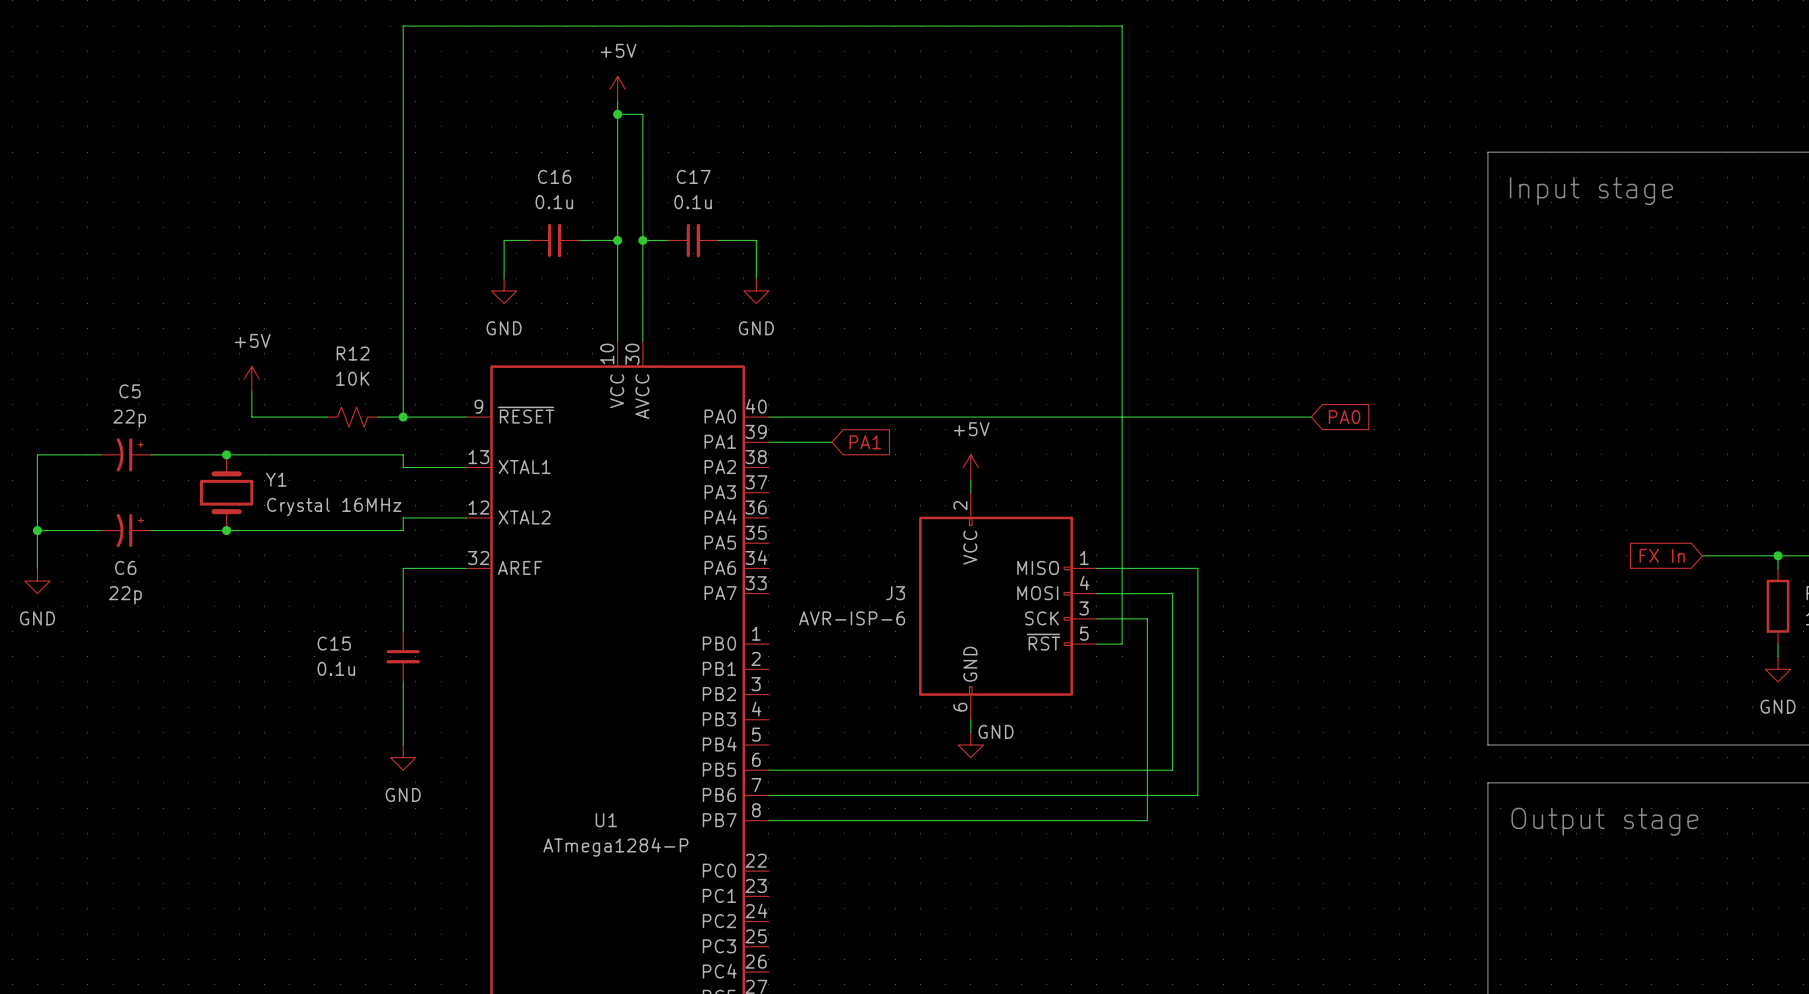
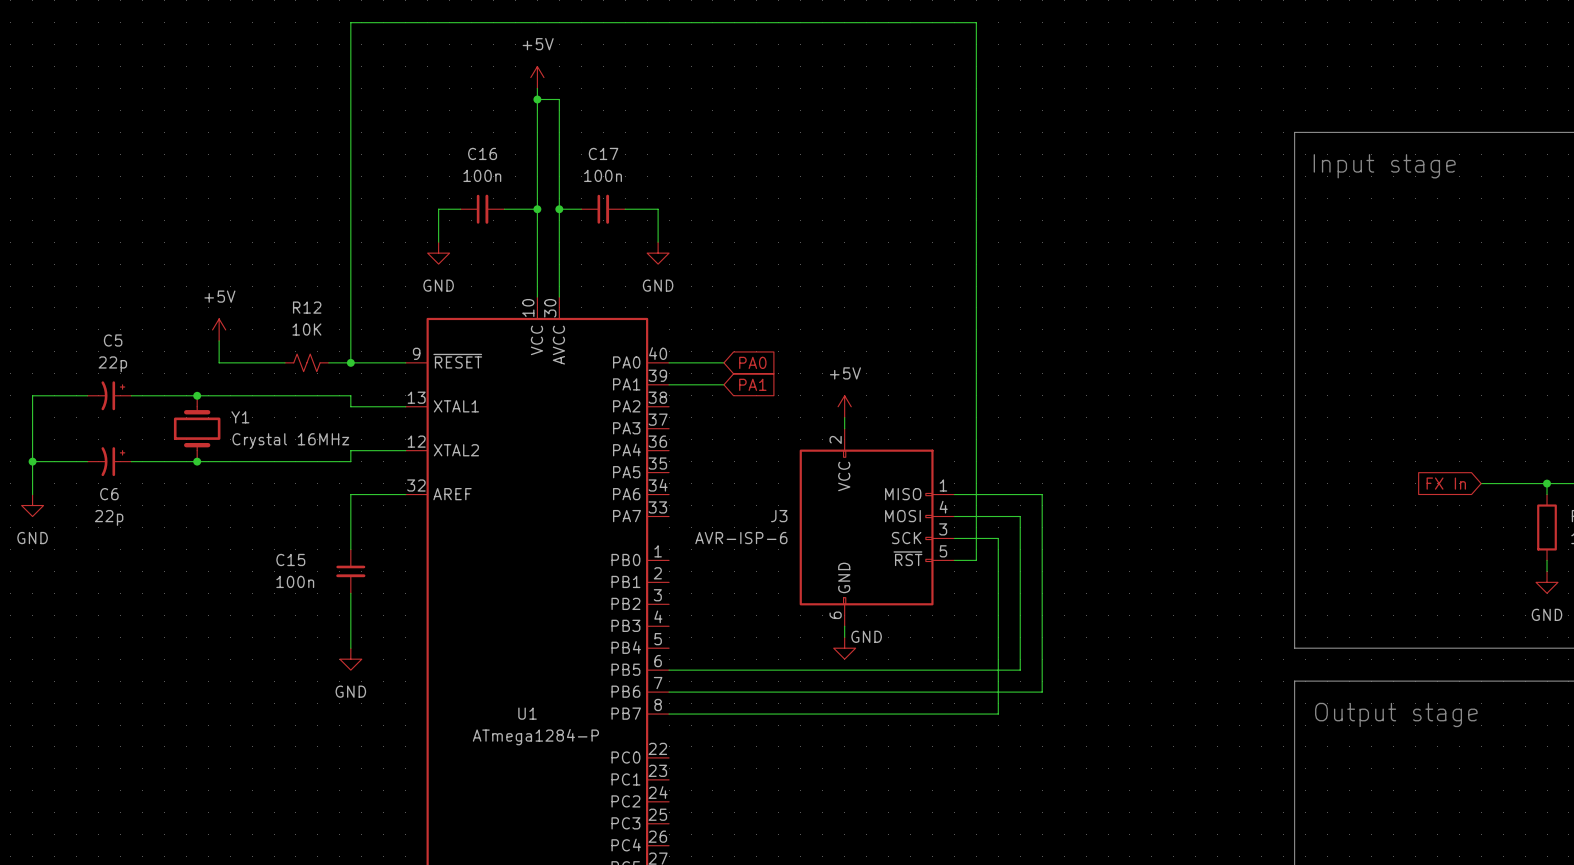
C16 value: 0.1u (554, 202) -> 100n (482, 175)
C17 value: 0.1u (693, 202) -> 100n (603, 175)
wire: (832, 417) (1311, 417) -> none
global label: none -> PA0 (752, 362)
global label: PA0 (1344, 417) -> none
C15 value: 0.1u (336, 668) -> 100n (295, 581)

